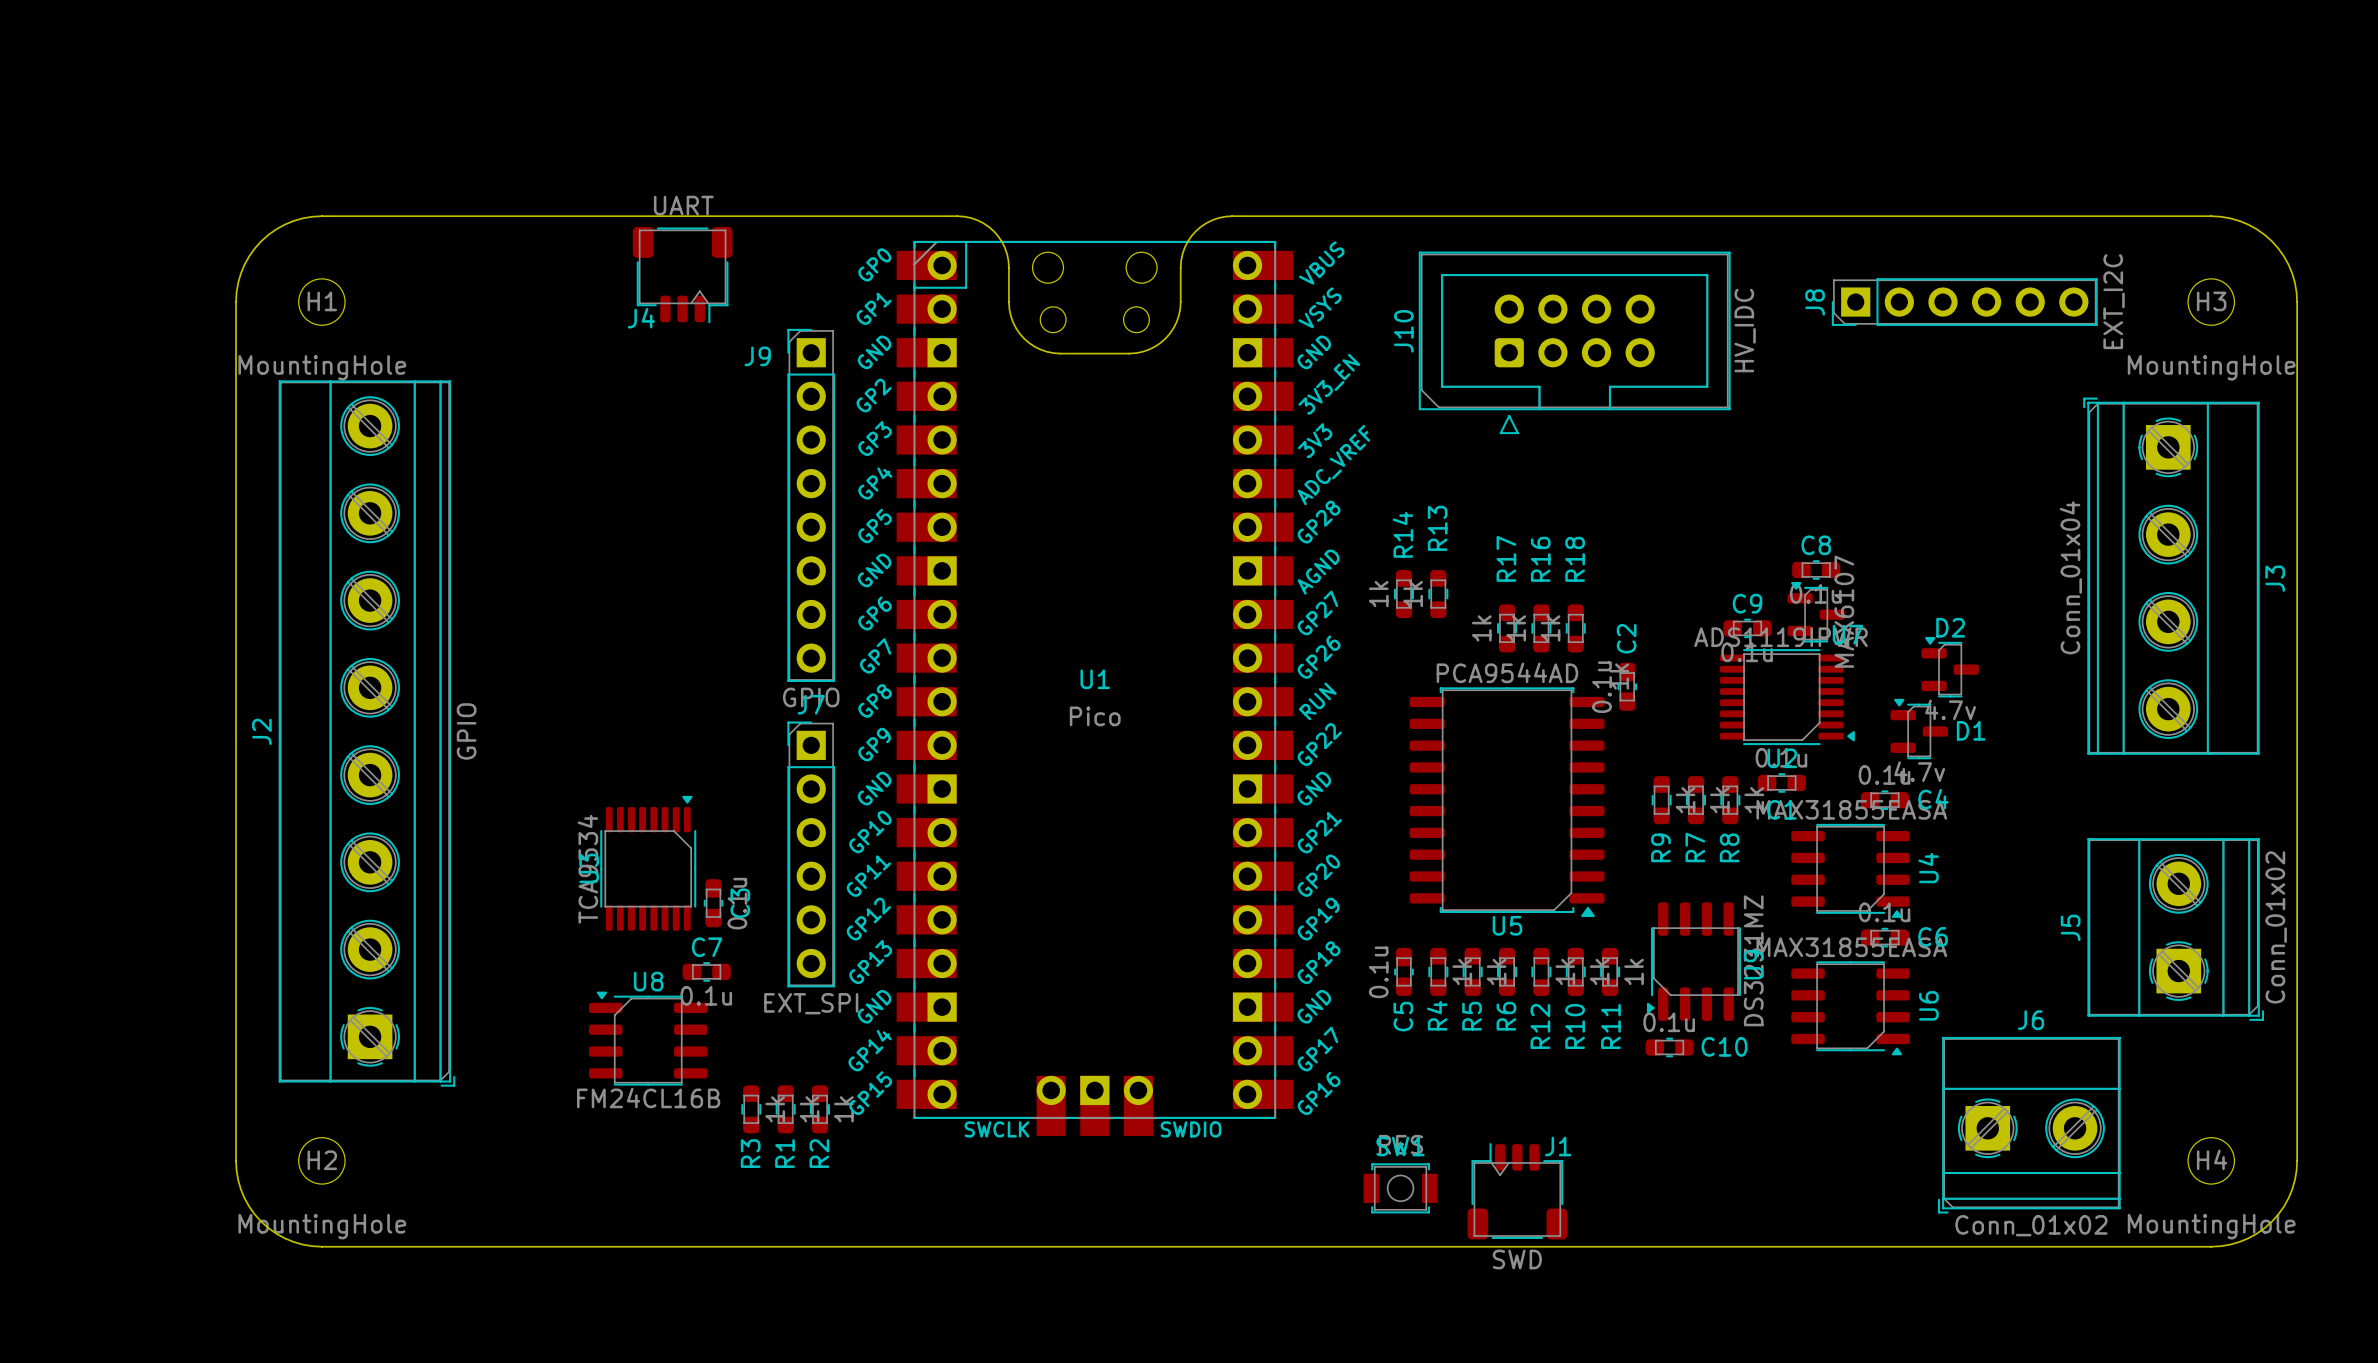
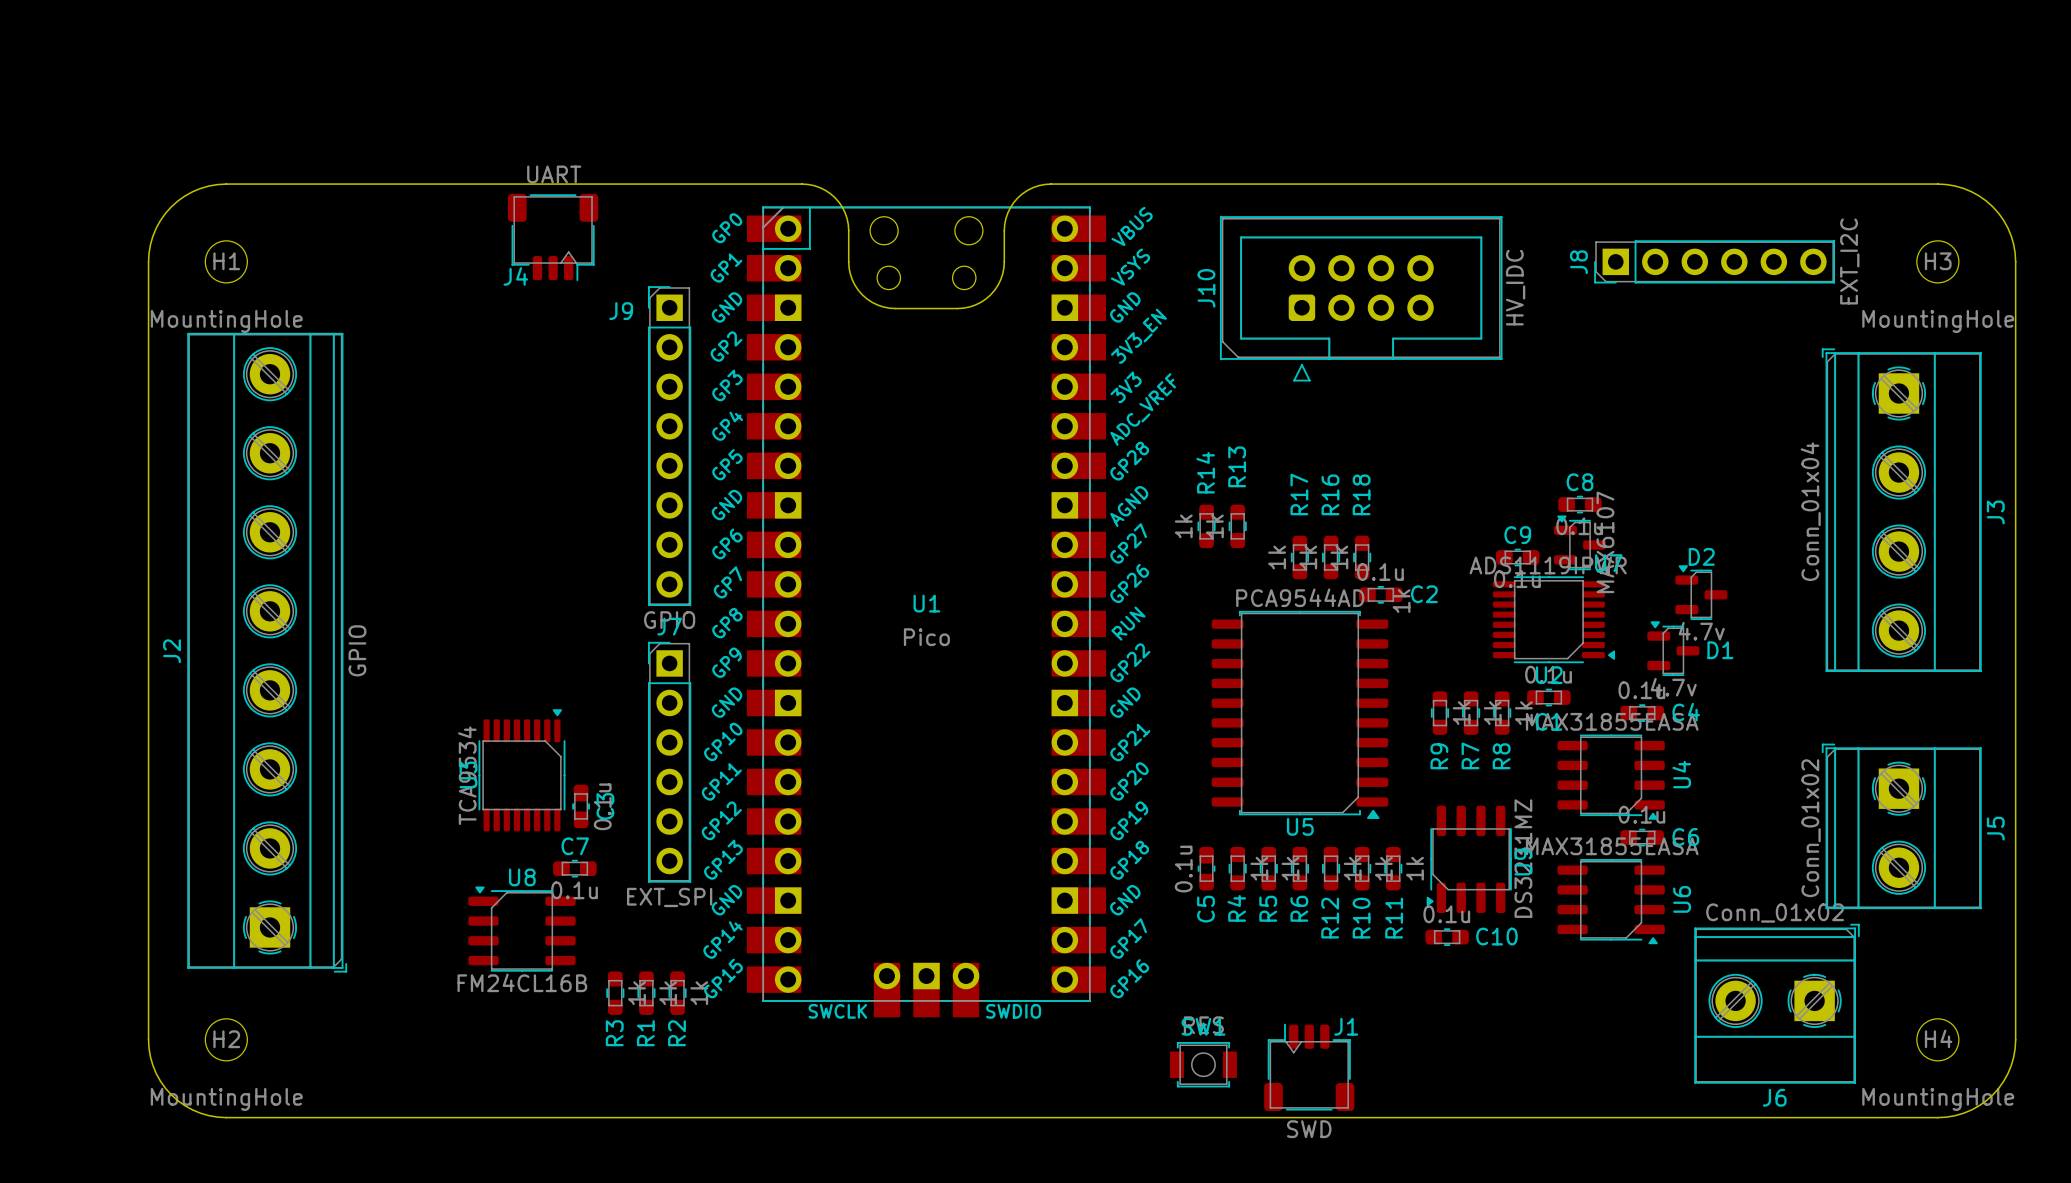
C2 rotation: 0° (1627, 686) -> 90° clockwise (1380, 594)
C2 position: (1627, 686) -> (1380, 594)
J5 rotation: 0° (2175, 929) -> 180° (1901, 826)
J6 rotation: 0° (2029, 1125) -> 180° (1776, 1003)

